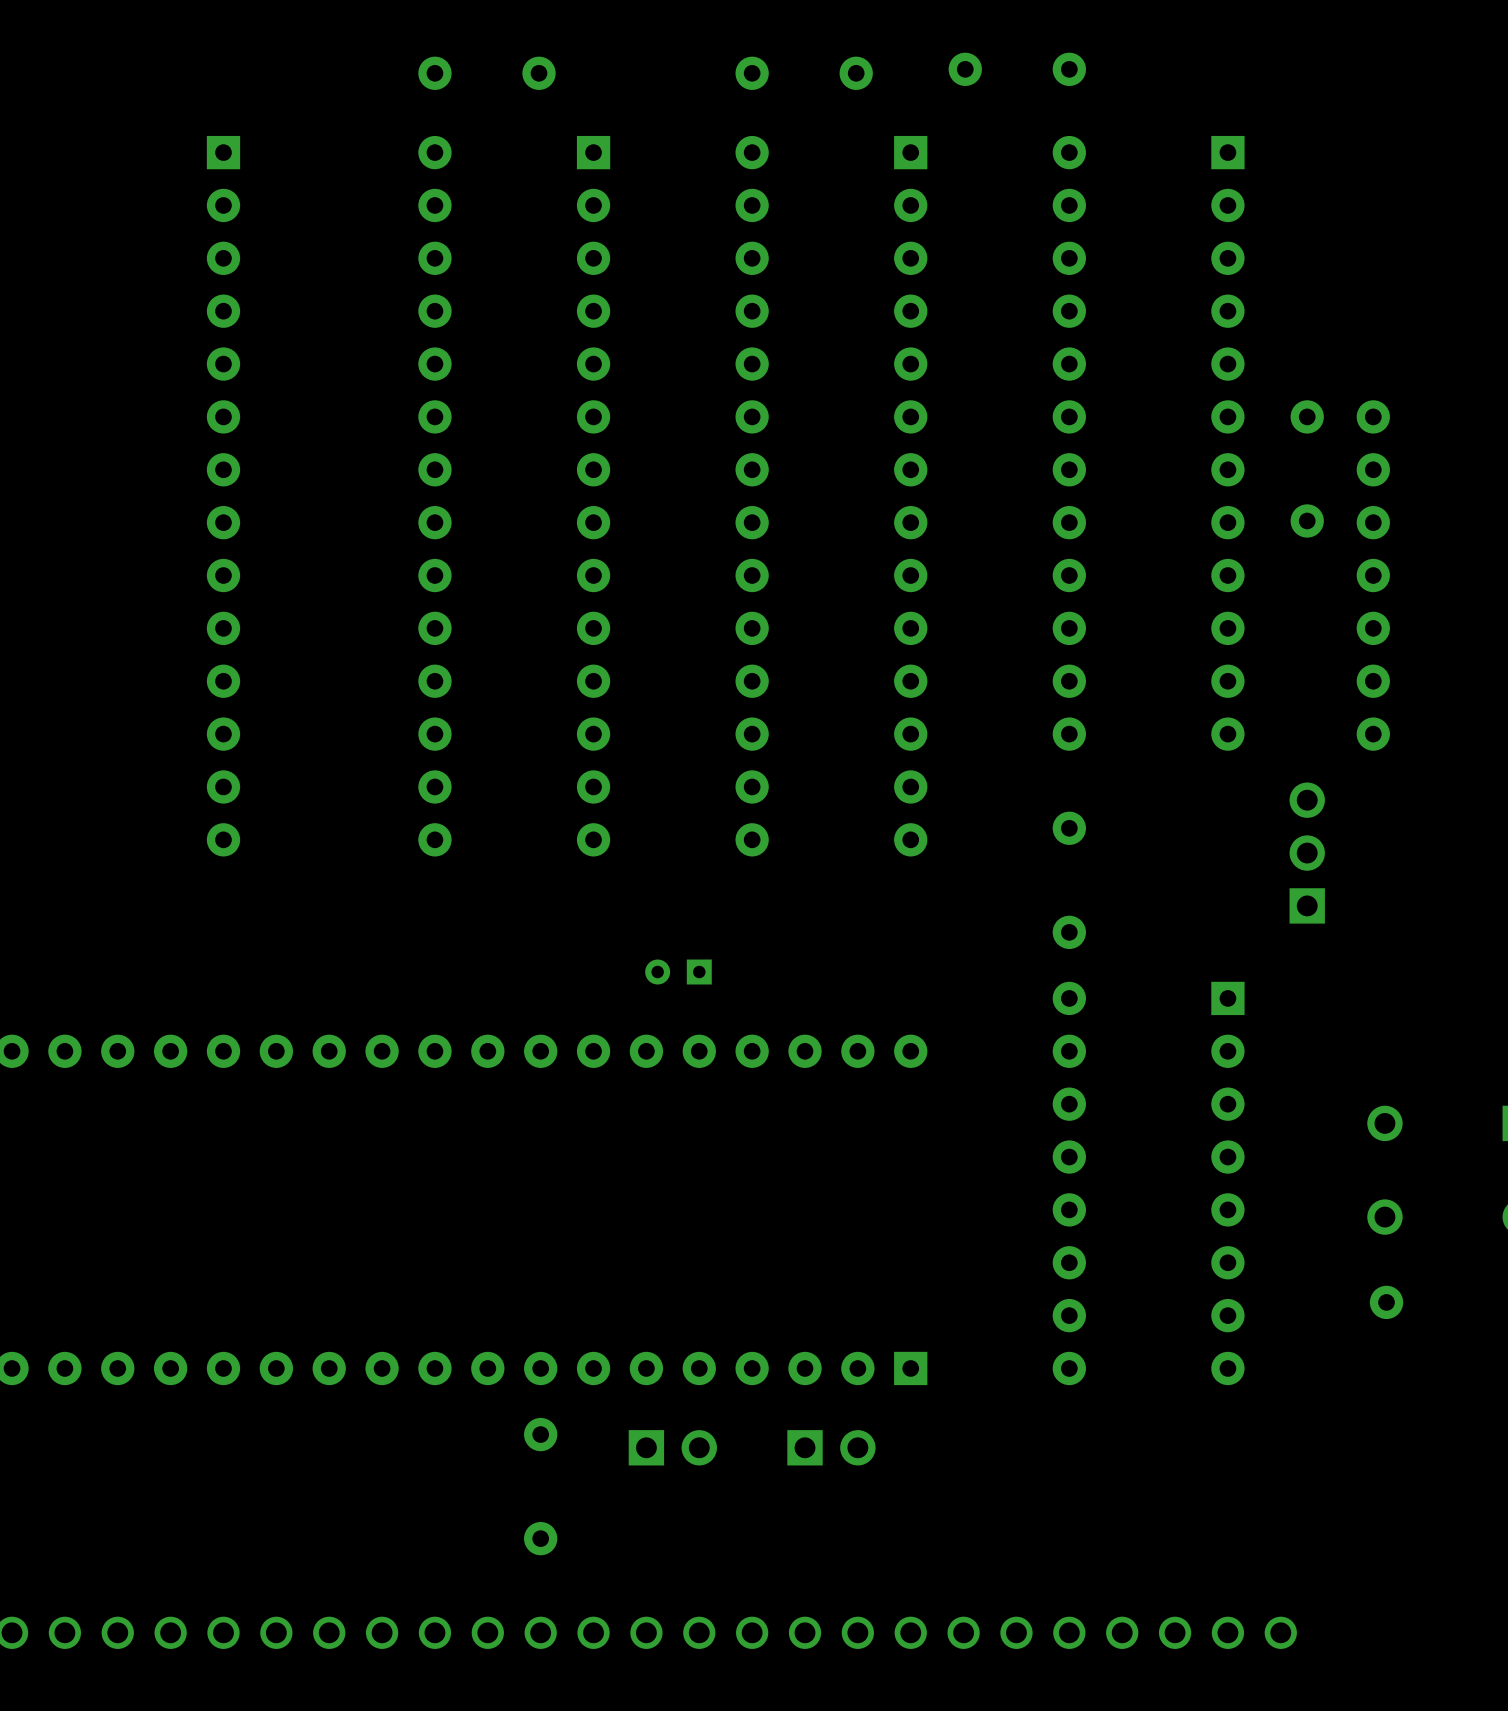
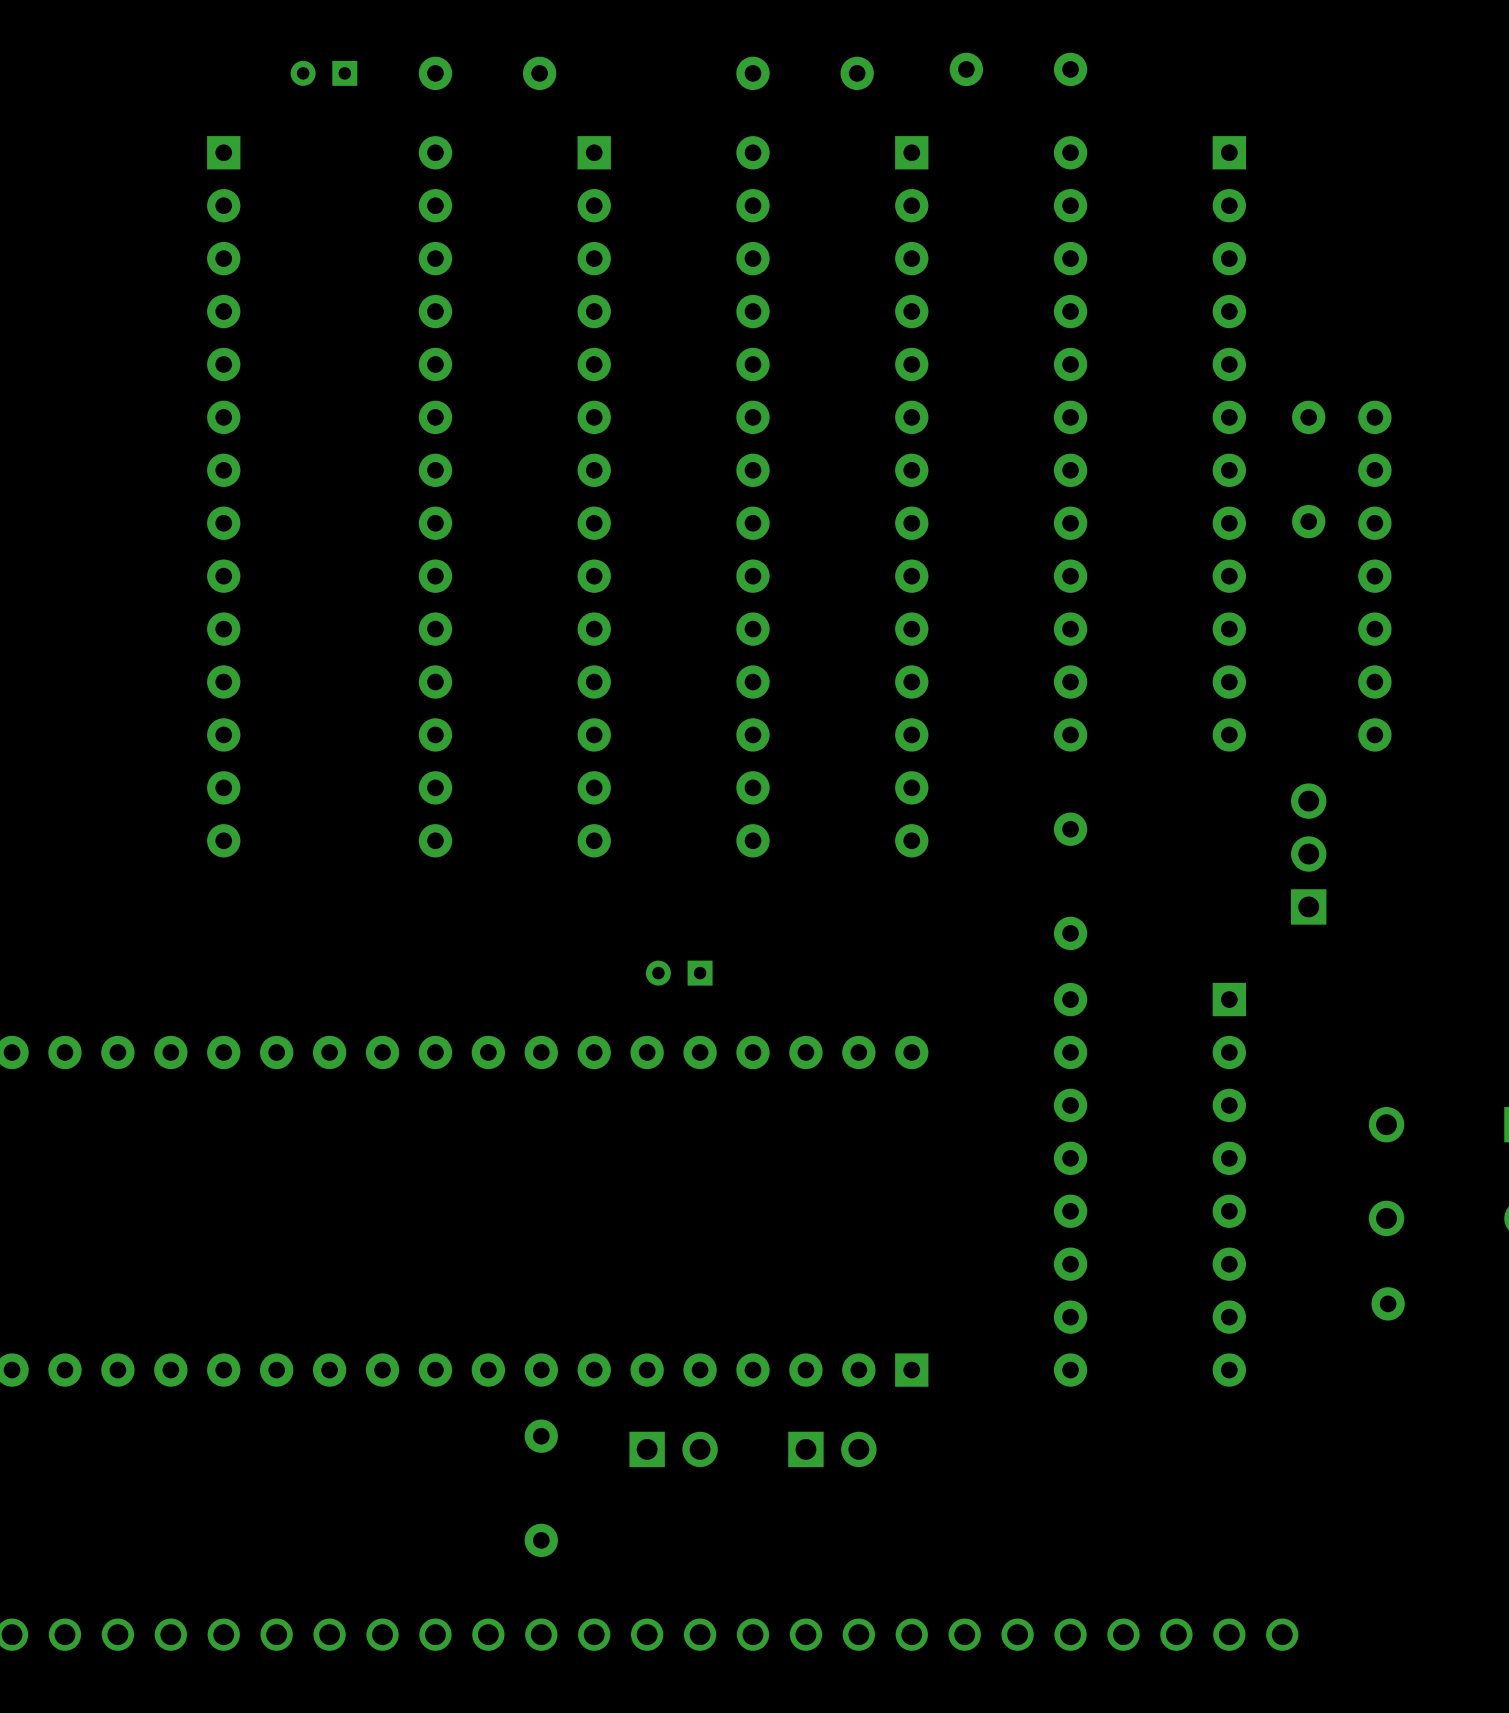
part: none -> (323, 73)

